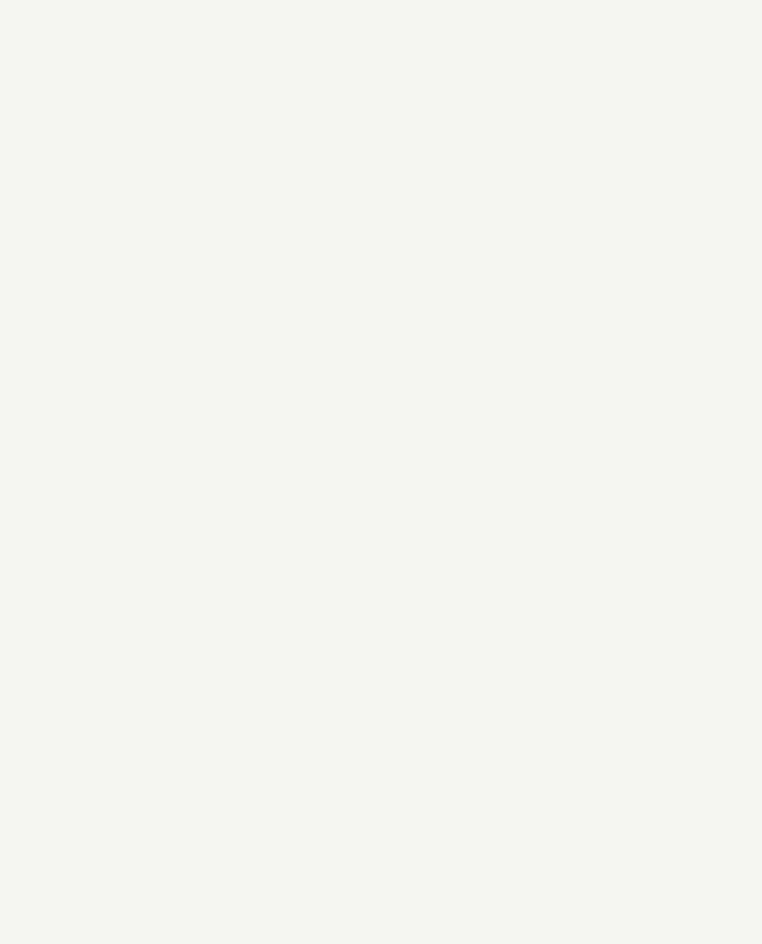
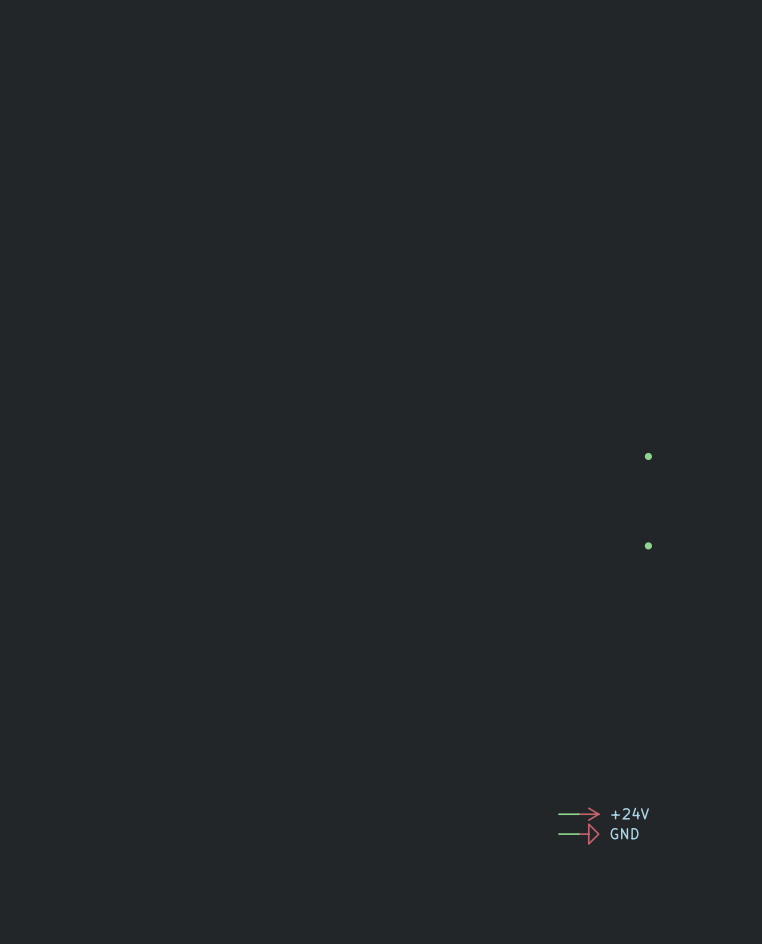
junction: none -> (648, 456)
junction: none -> (648, 545)
wire: none -> (558, 814) (578, 814)
power symbol: none -> +24V (588, 814)
wire: none -> (558, 834) (578, 834)
power symbol: none -> GND (588, 834)

